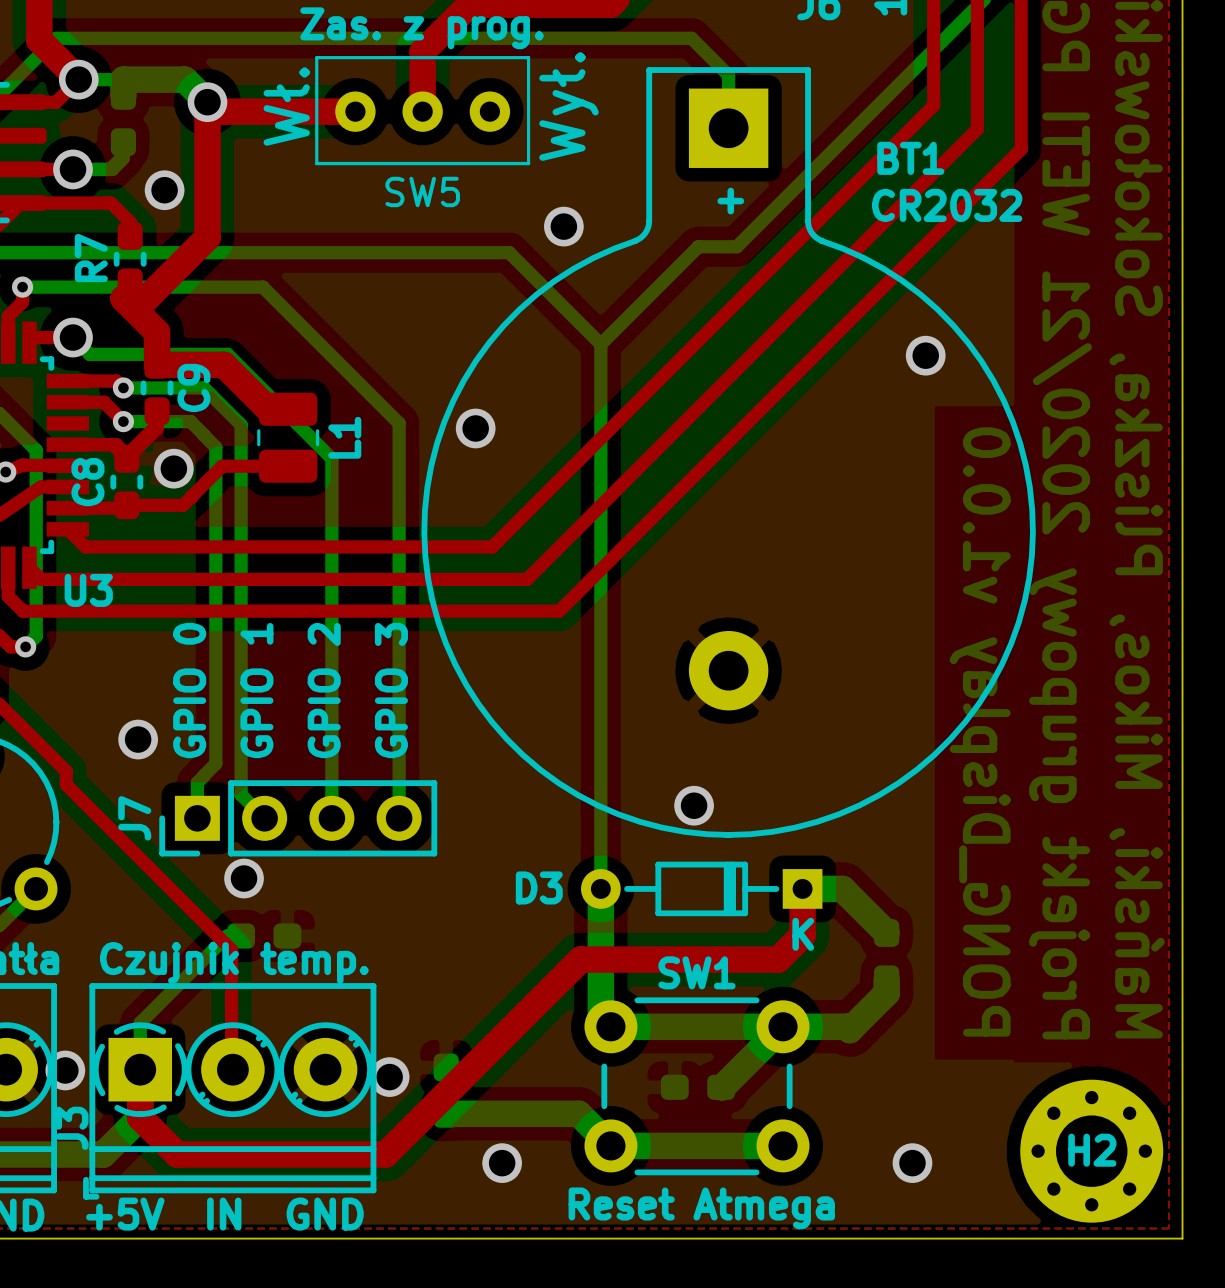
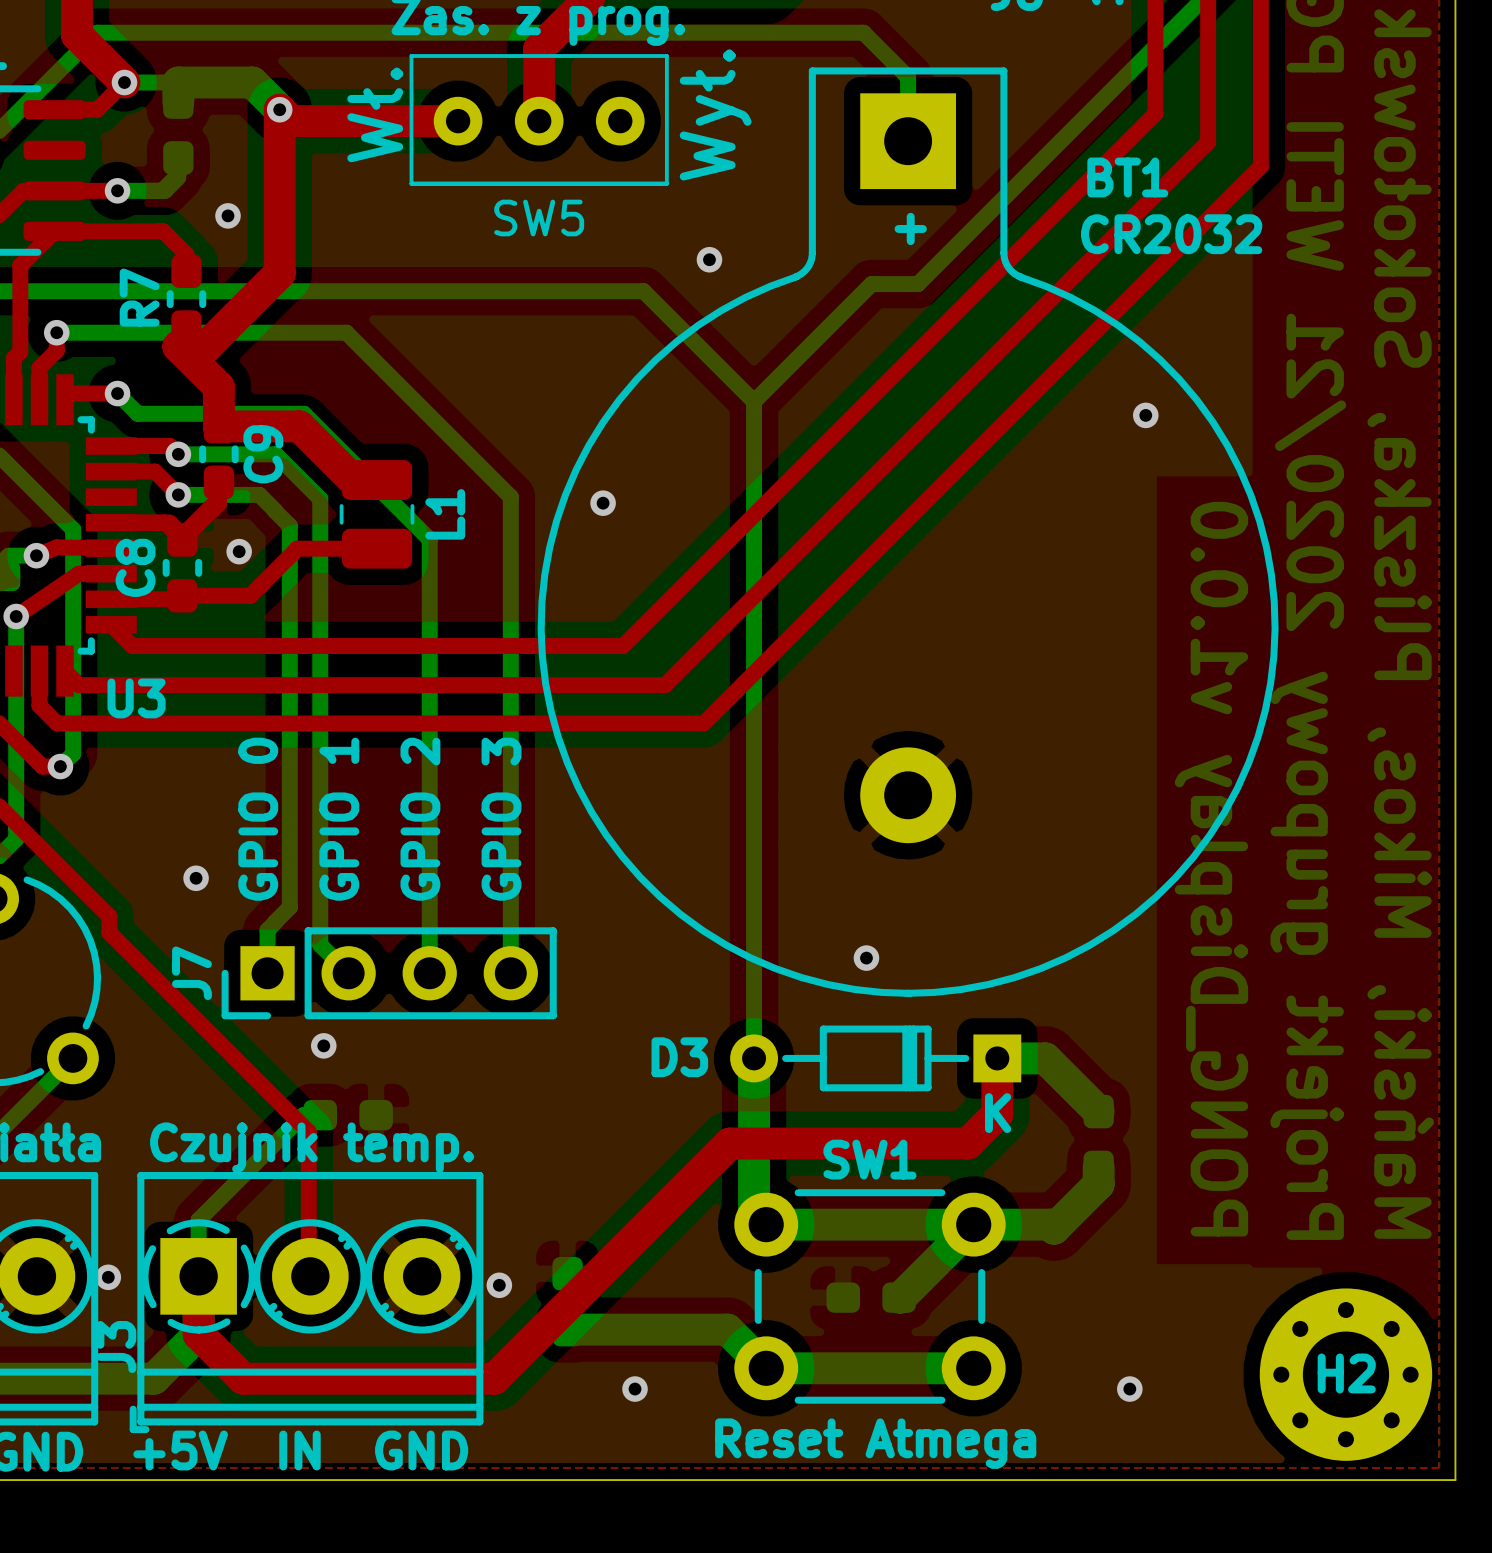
via size: [58, 59, 99, 100] -> [111, 69, 138, 96]
via size: [187, 82, 228, 123] -> [266, 96, 293, 123]
via size: [53, 149, 93, 190] -> [104, 178, 131, 204]
via size: [144, 170, 185, 211] -> [215, 203, 241, 229]
via size: [544, 206, 584, 247] -> [696, 246, 723, 273]
via size: [53, 317, 93, 358] -> [104, 380, 131, 407]
via size: [905, 335, 946, 376] -> [1133, 402, 1159, 429]
via size: [455, 408, 496, 449] -> [590, 490, 616, 516]
via size: [154, 448, 194, 489] -> [226, 538, 252, 565]
via size: [118, 719, 158, 760] -> [183, 865, 209, 892]
via size: [674, 785, 714, 826] -> [853, 945, 880, 971]
via size: [224, 858, 264, 899] -> [311, 1033, 337, 1059]
via size: [45, 1050, 86, 1091] -> [95, 1264, 122, 1291]
via size: [369, 1057, 410, 1097] -> [486, 1272, 513, 1299]
via size: [482, 1143, 523, 1183] -> [622, 1376, 648, 1402]
via size: [892, 1143, 933, 1183] -> [1117, 1376, 1143, 1402]

